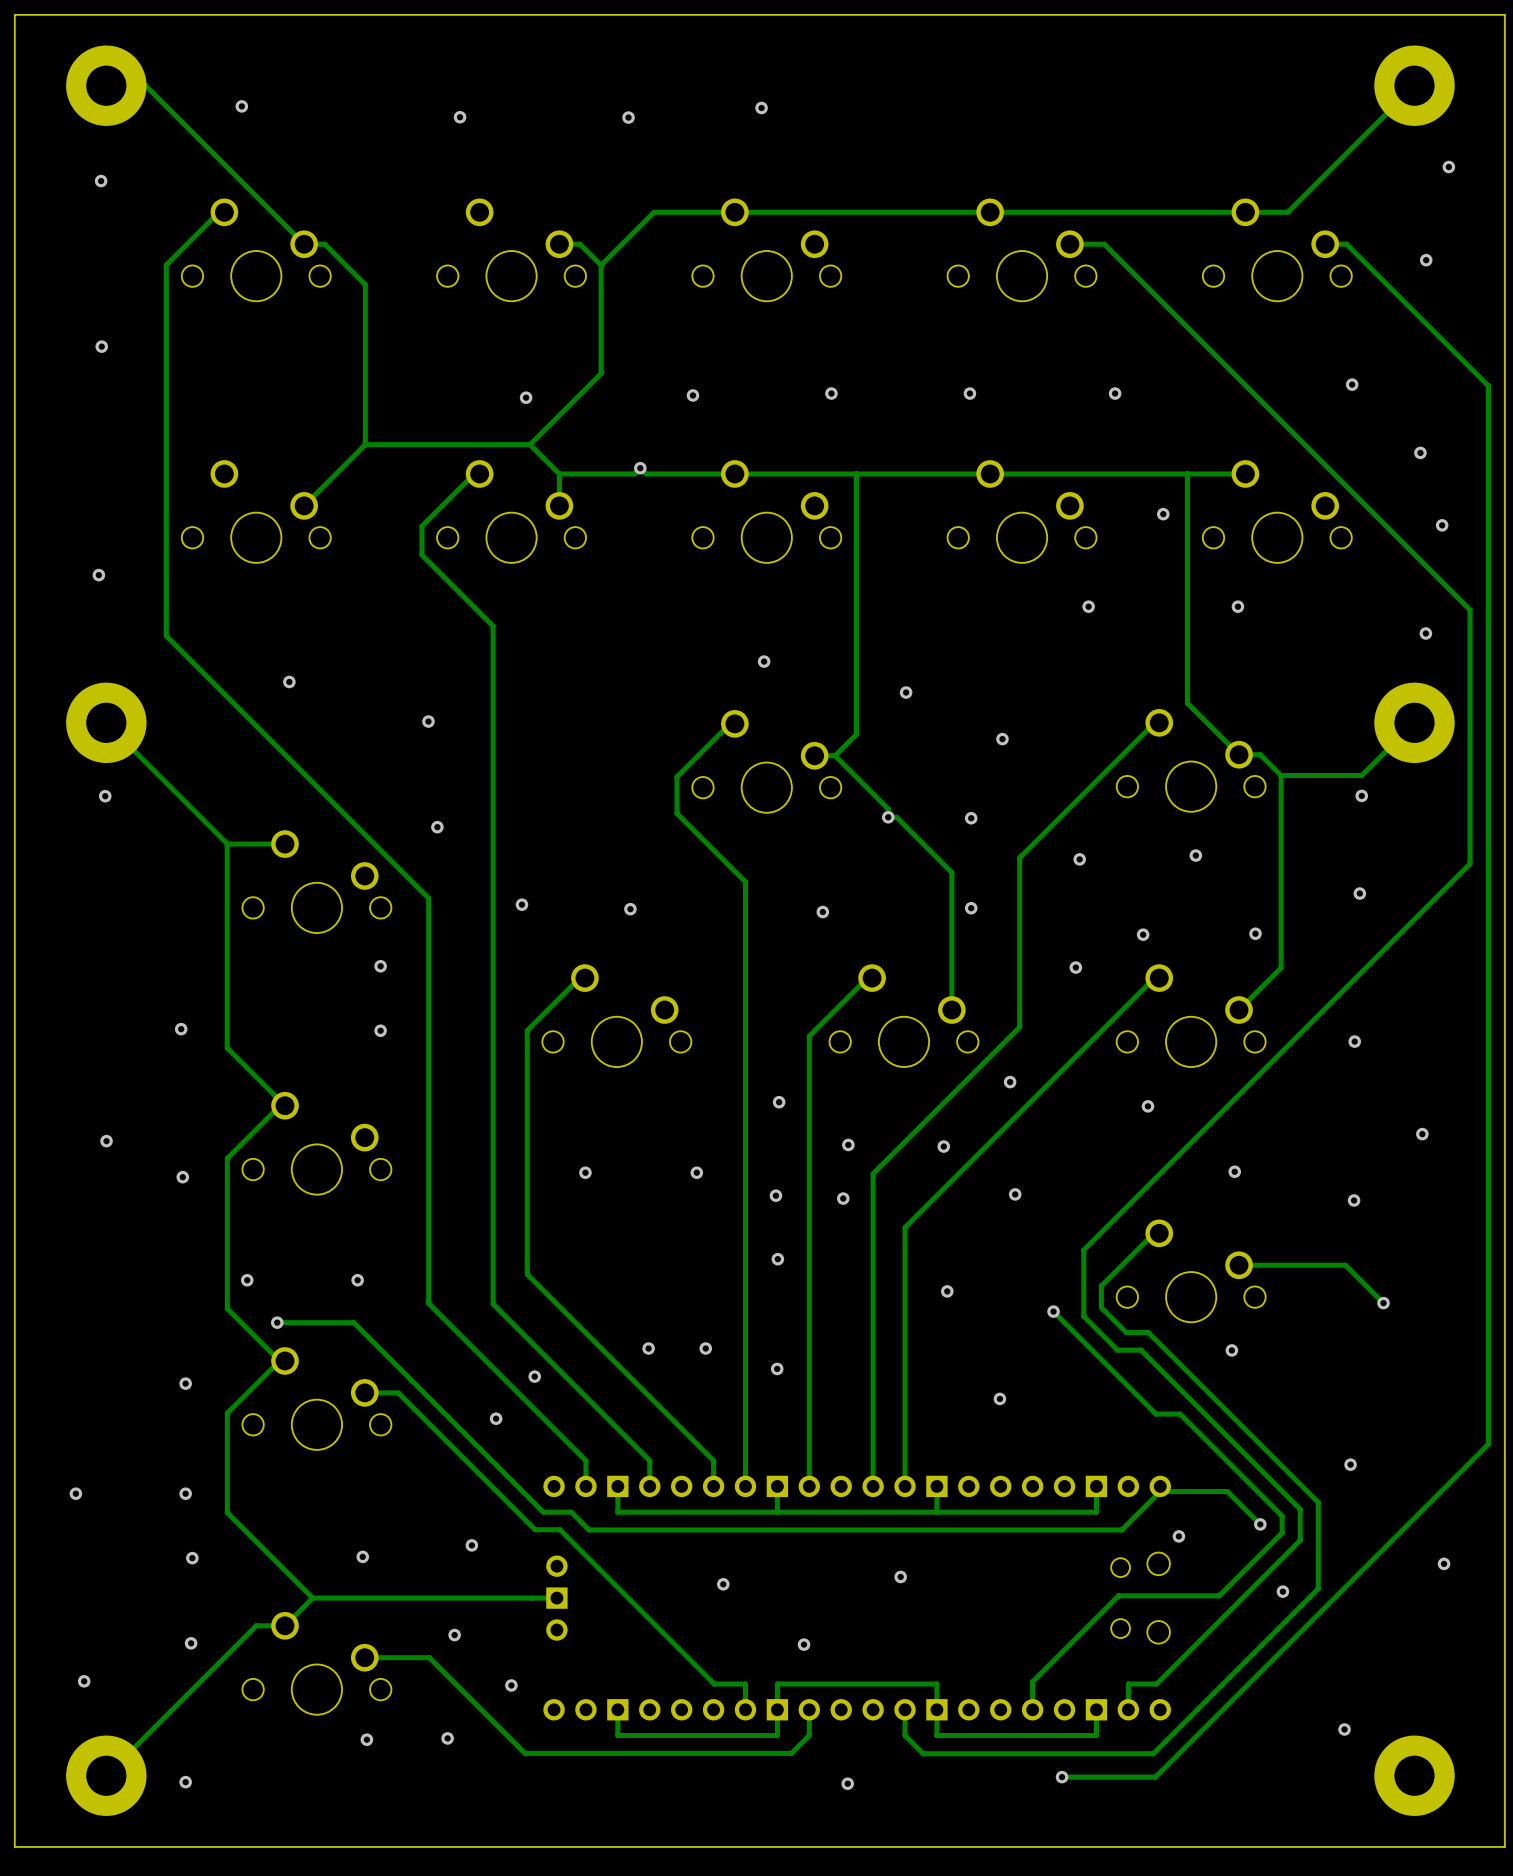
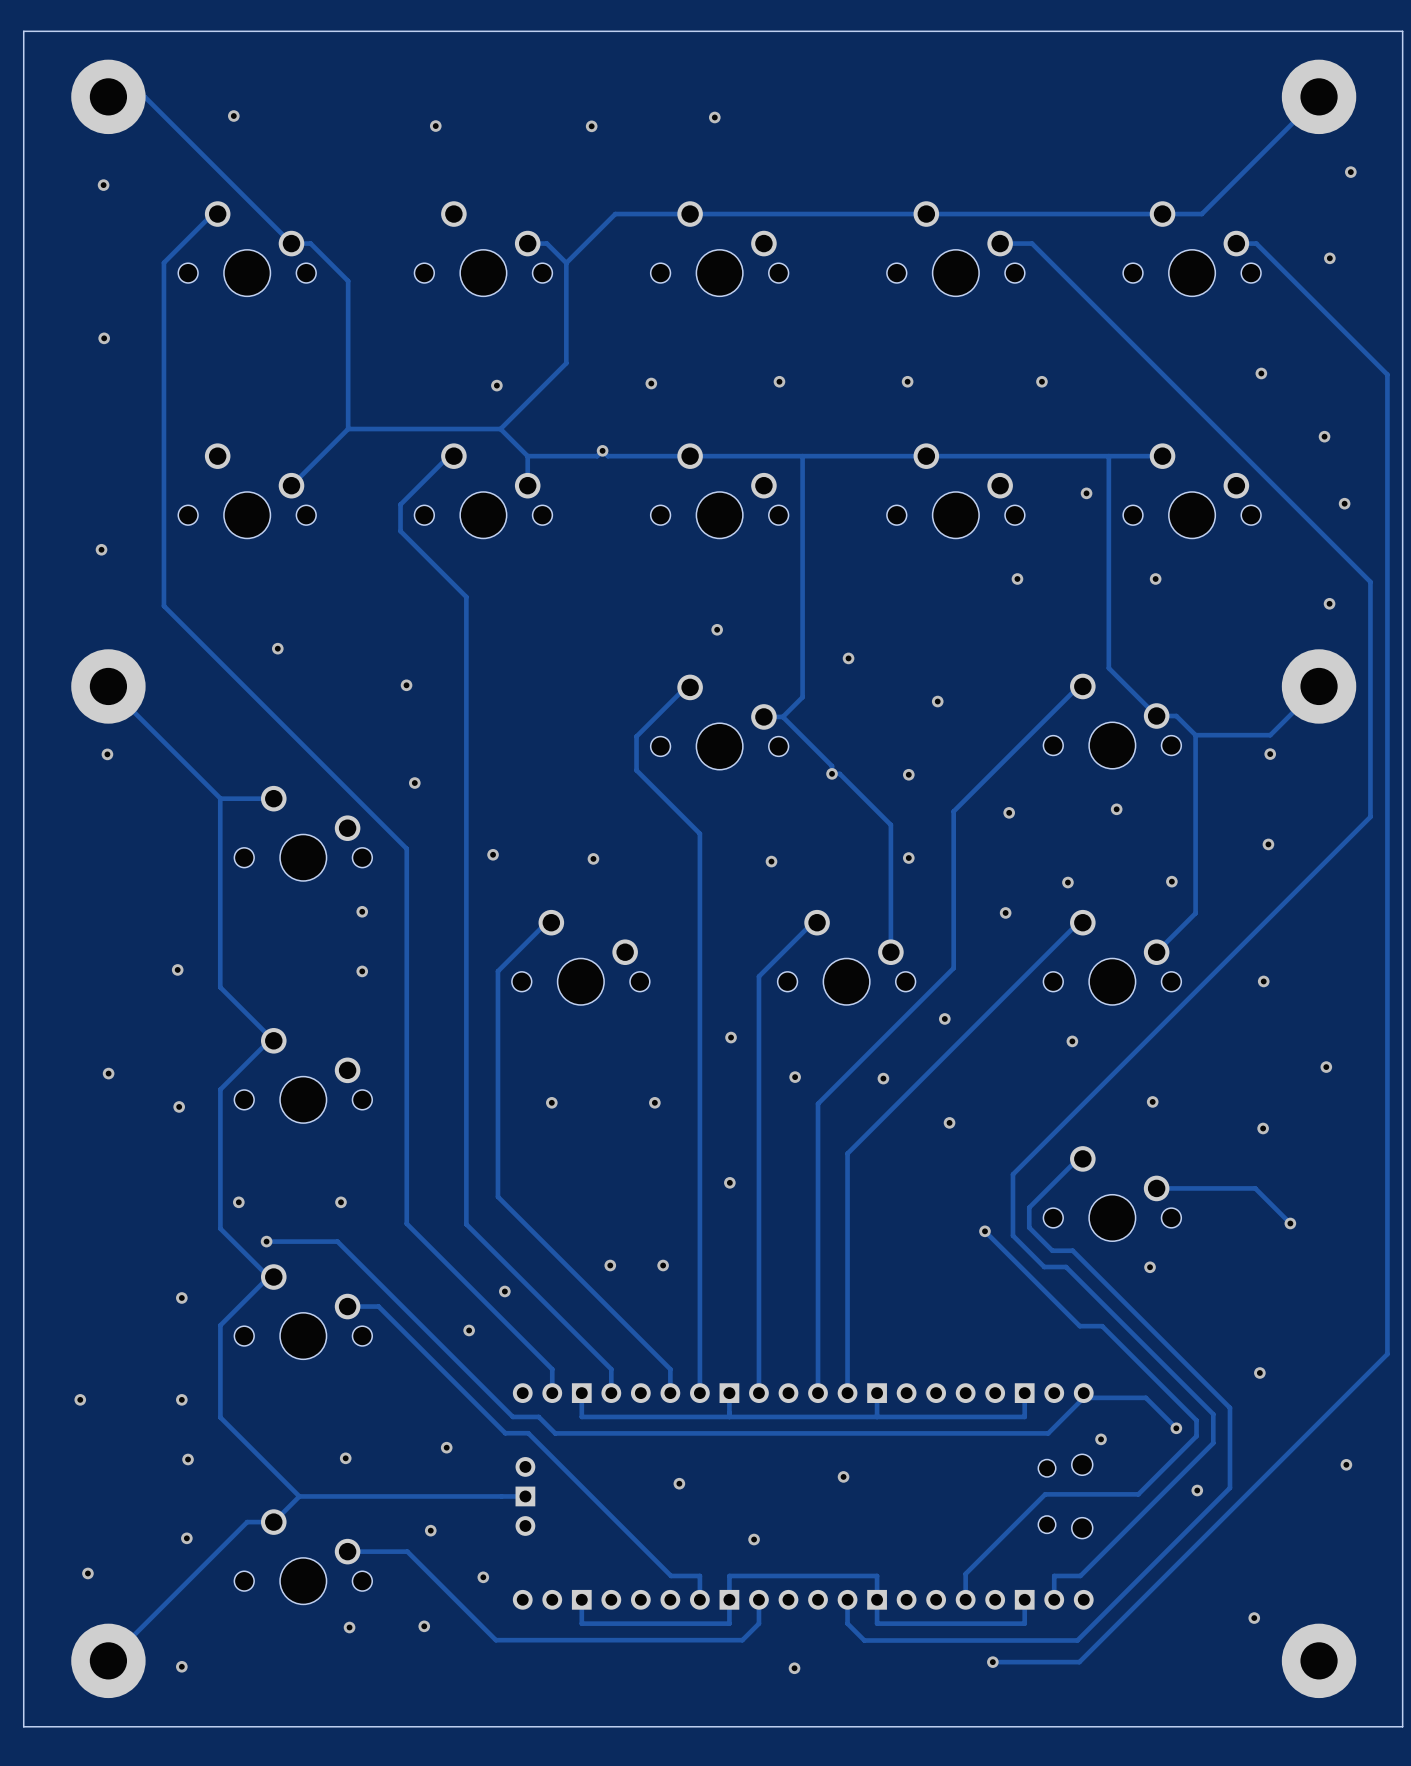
via: (775, 1195) -> none
via: (843, 1198) -> none
via: (947, 1291) -> none
via: (777, 1368) -> none
via: (999, 1398) -> none

